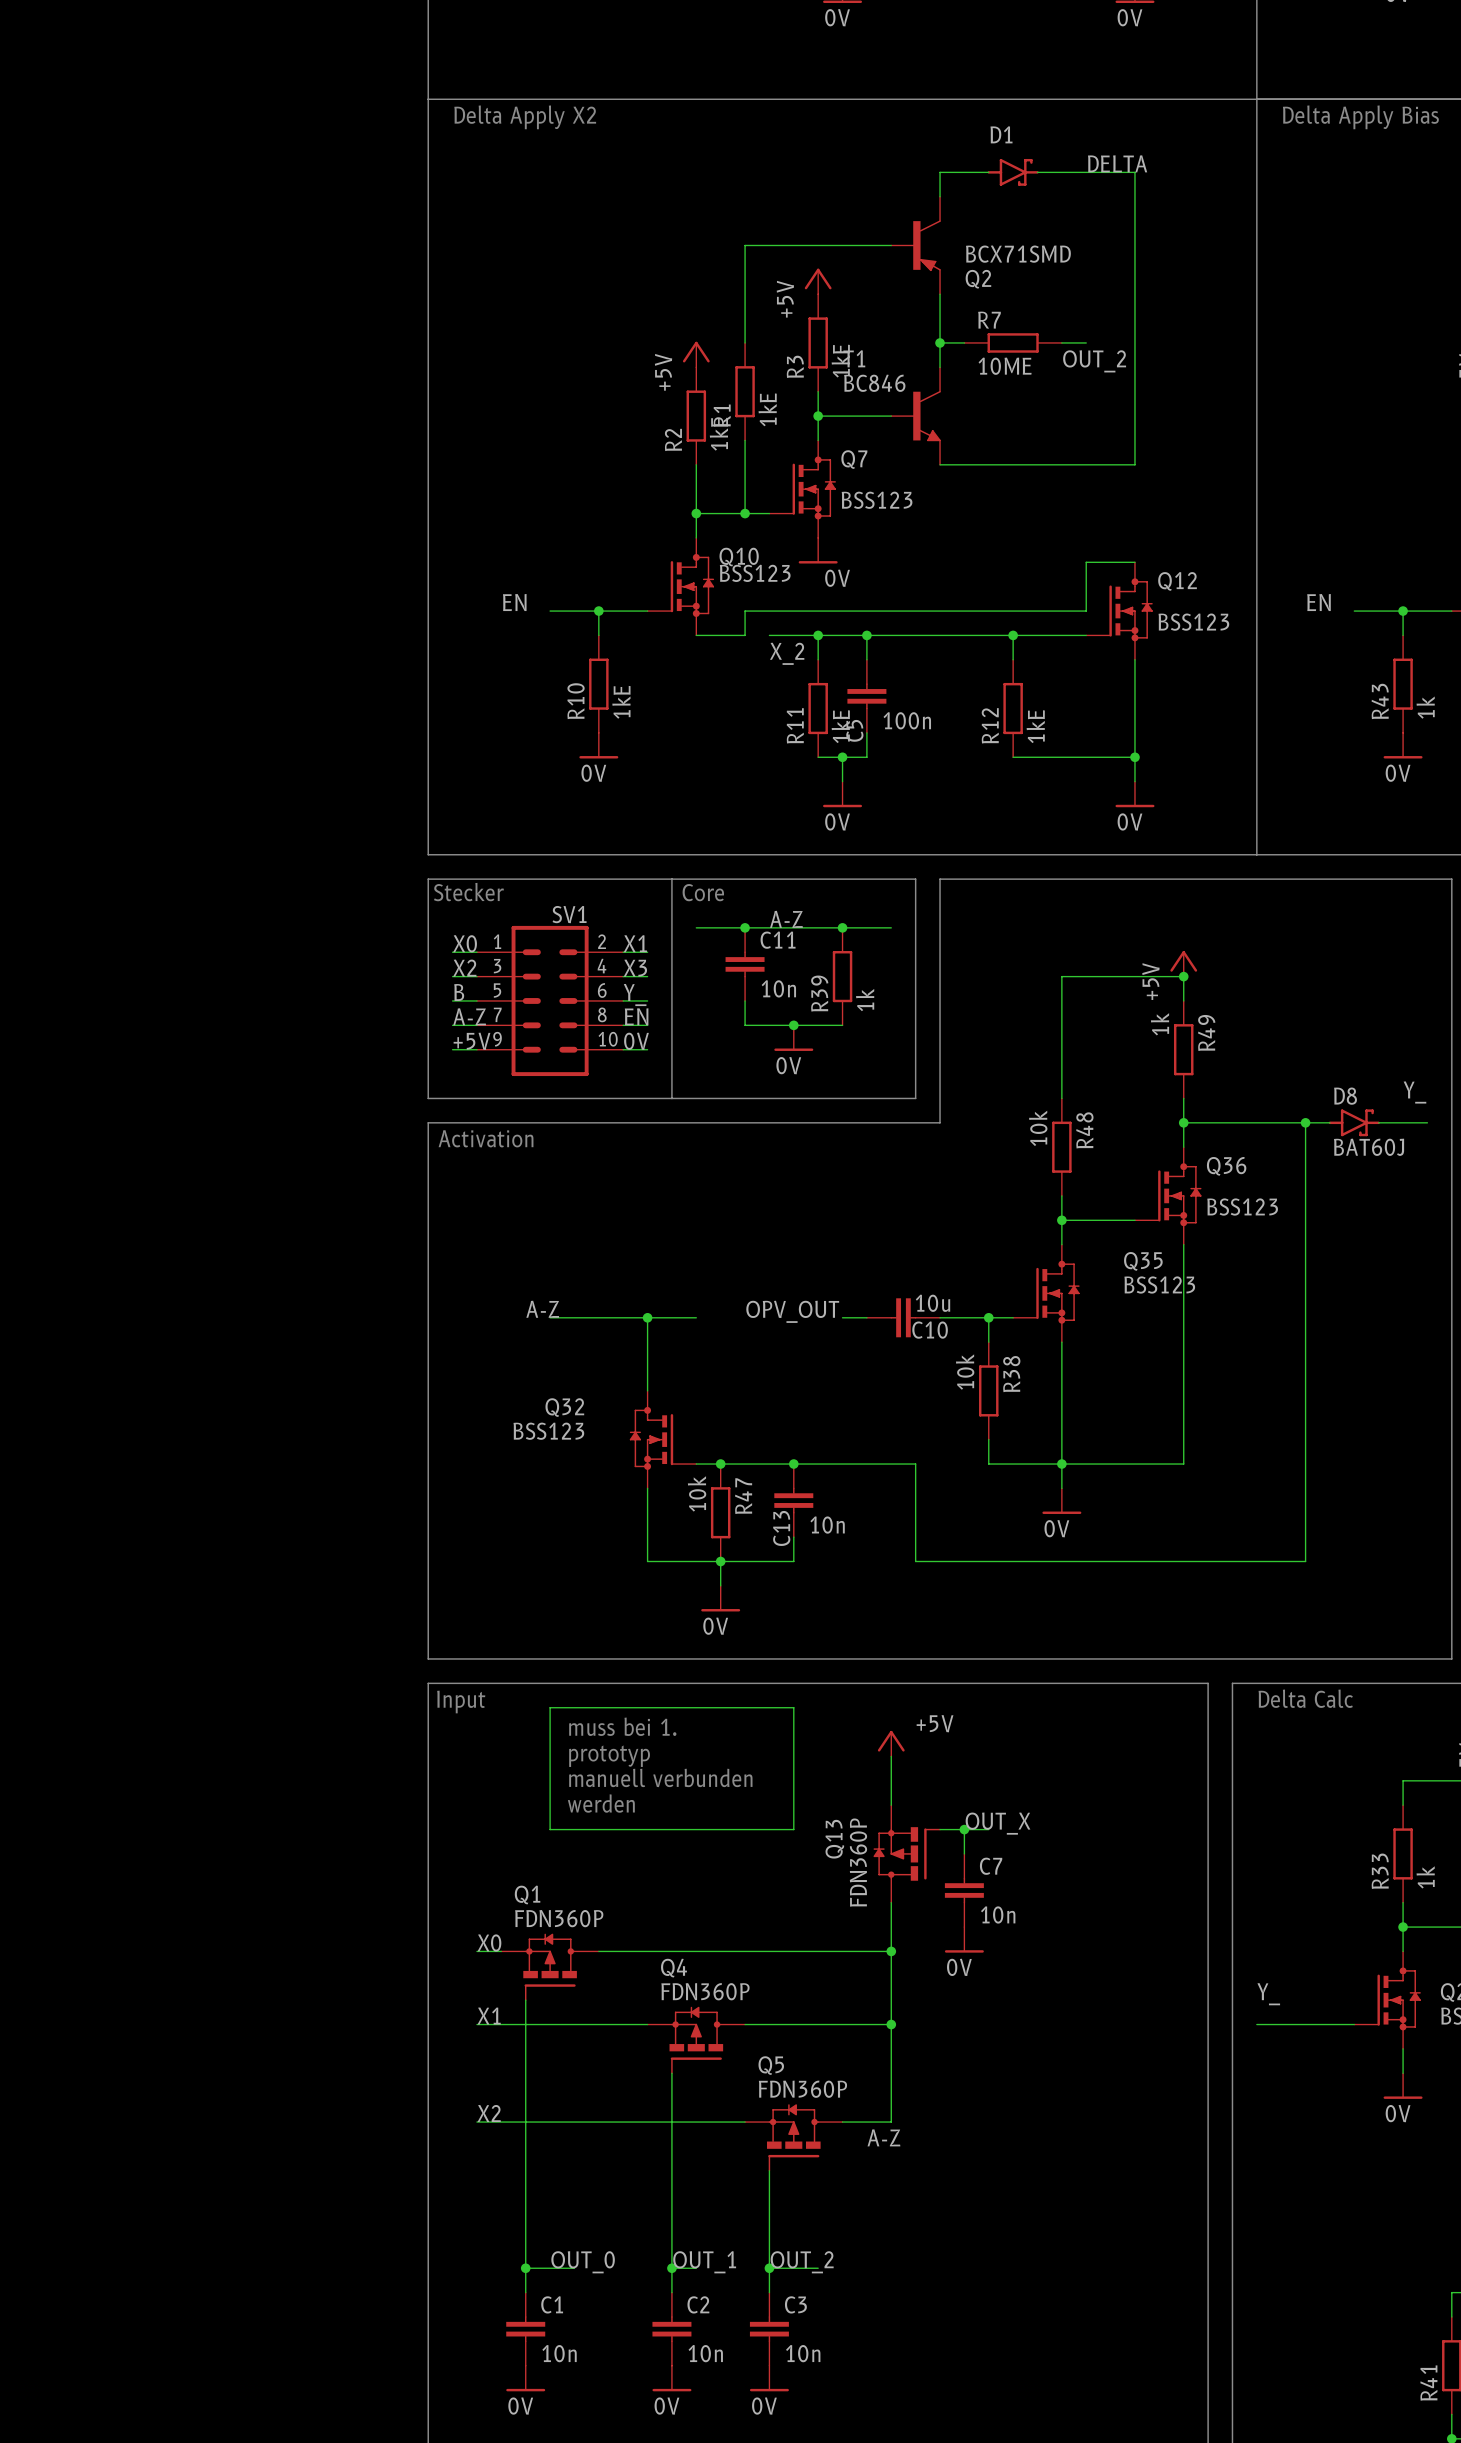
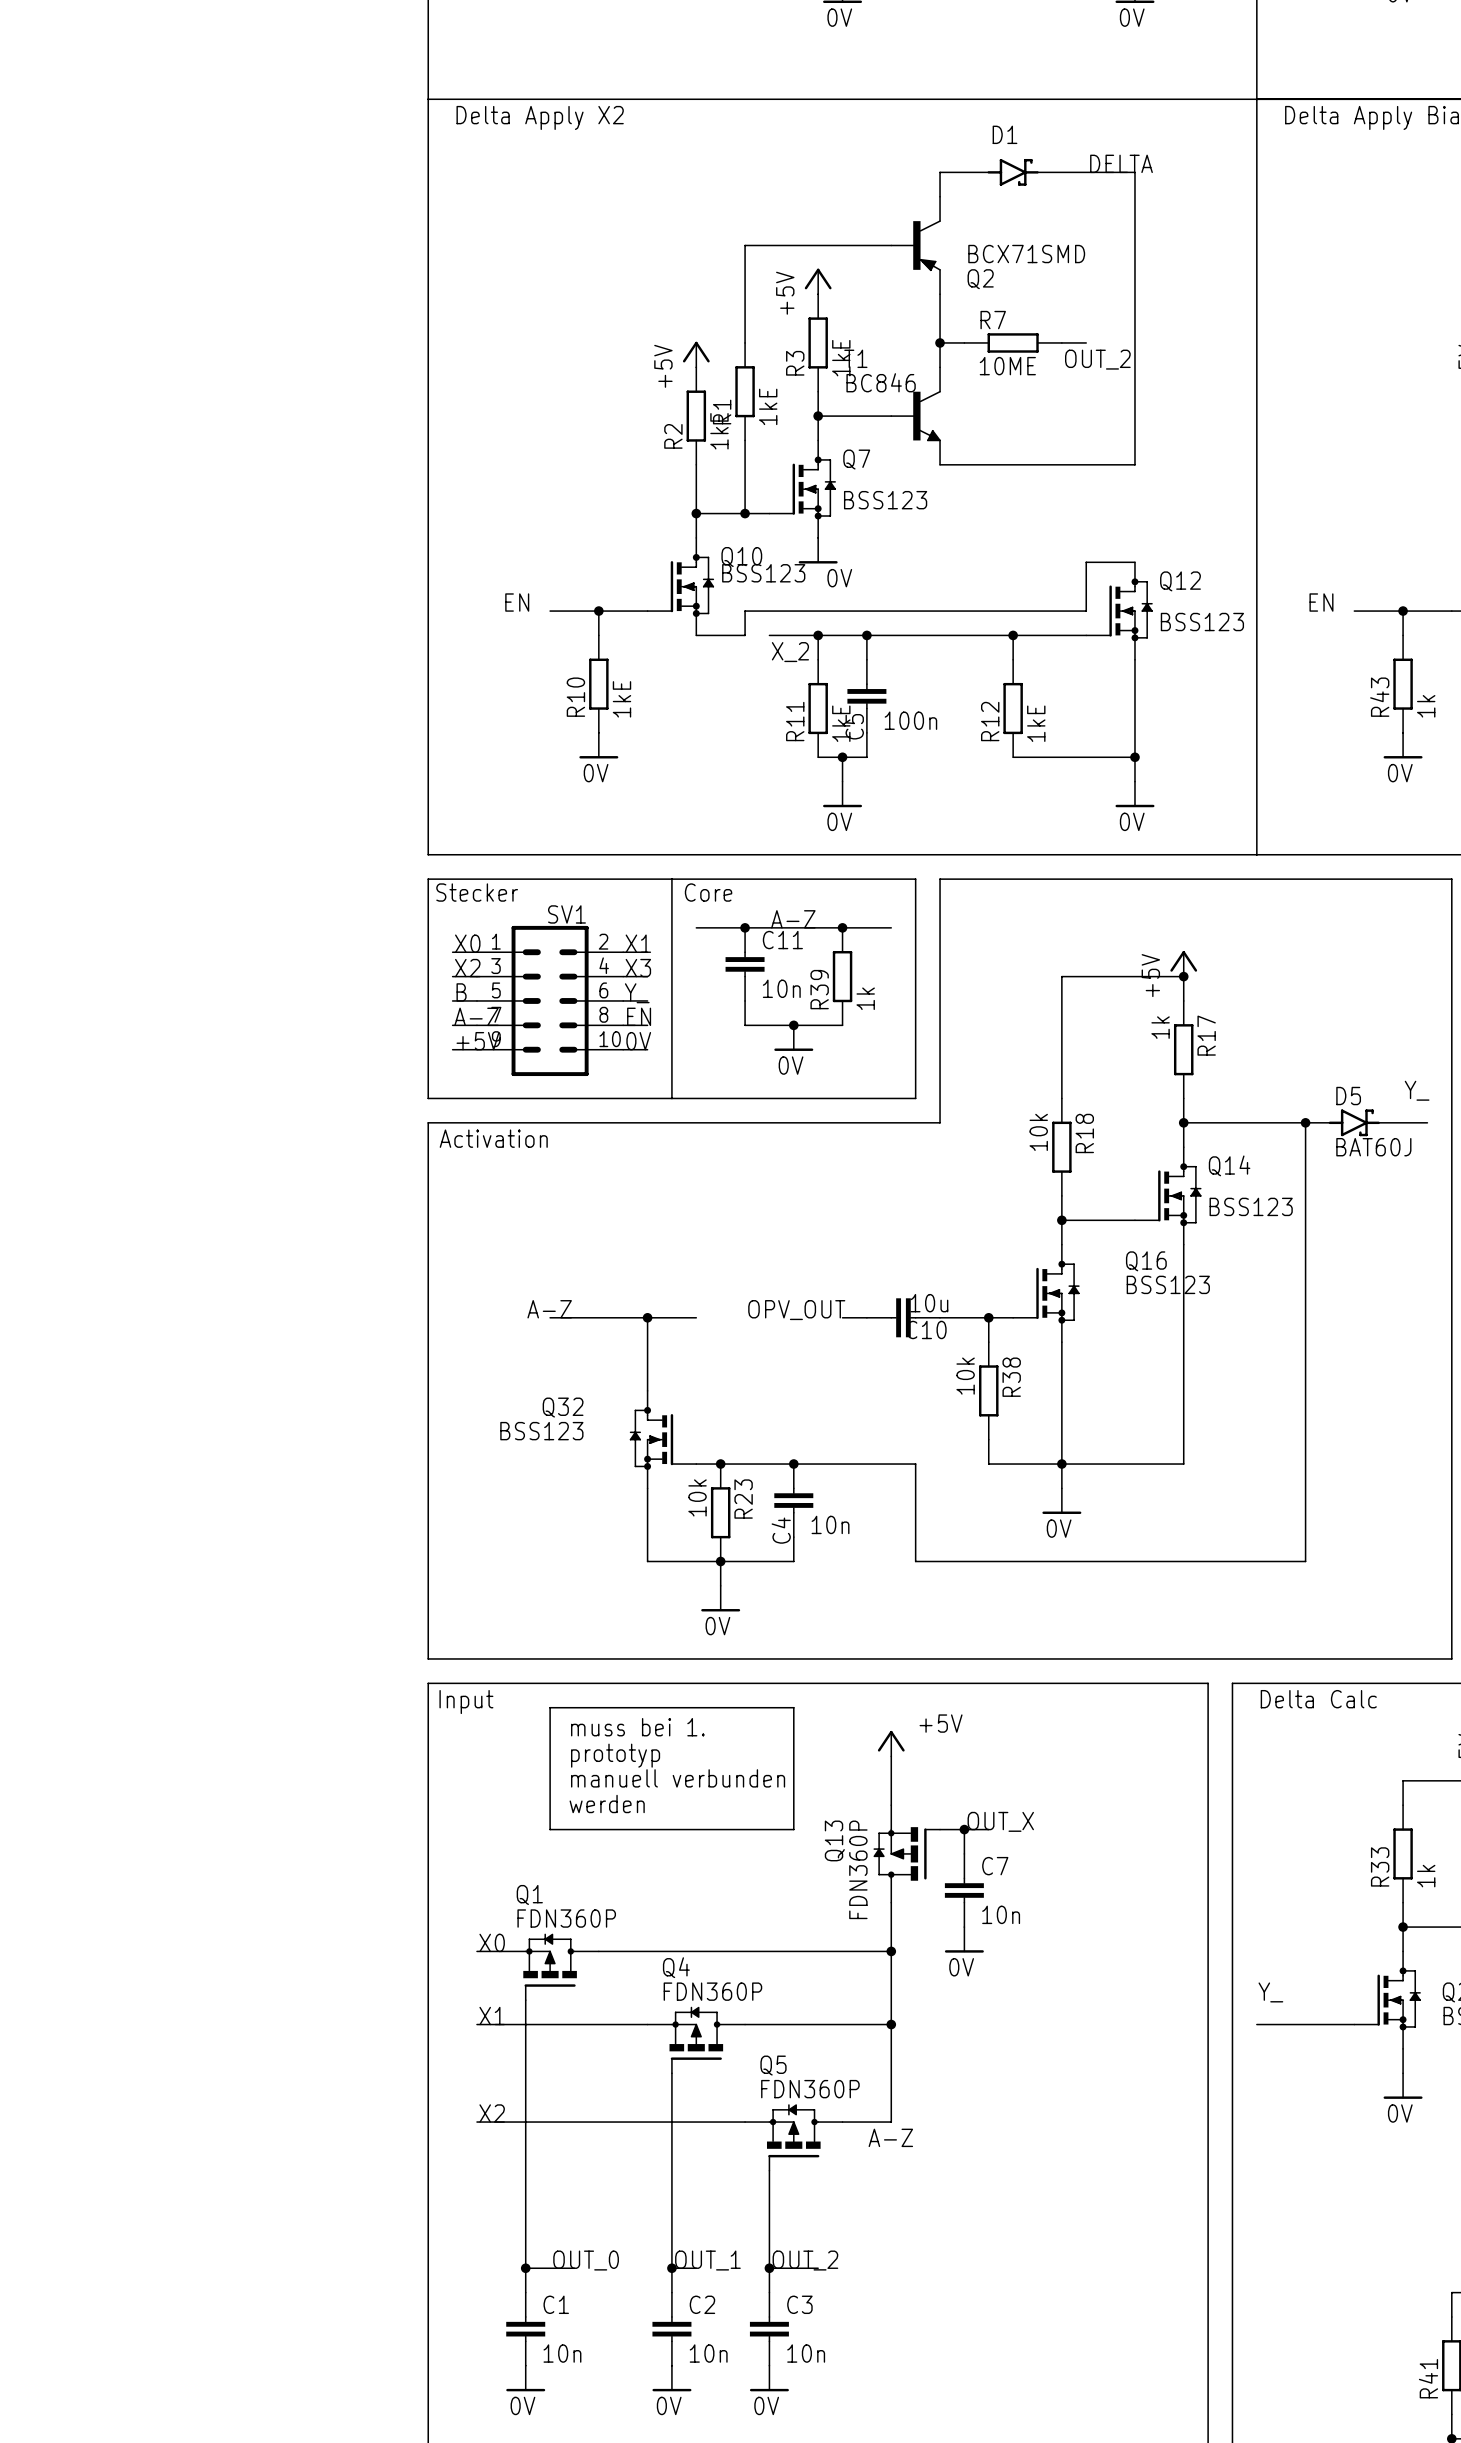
R49 name: R49 (1206, 1032) -> R17 (1206, 1035)
D8 name: D8 (1345, 1096) -> D5 (1348, 1096)
R48 name: R48 (1084, 1130) -> R18 (1084, 1133)
Q36 name: Q36 (1226, 1166) -> Q14 (1229, 1165)
Q35 name: Q35 (1143, 1261) -> Q16 (1146, 1261)
R47 name: R47 (743, 1496) -> R23 (743, 1499)
C13 name: C13 (781, 1528) -> C4 (781, 1530)

